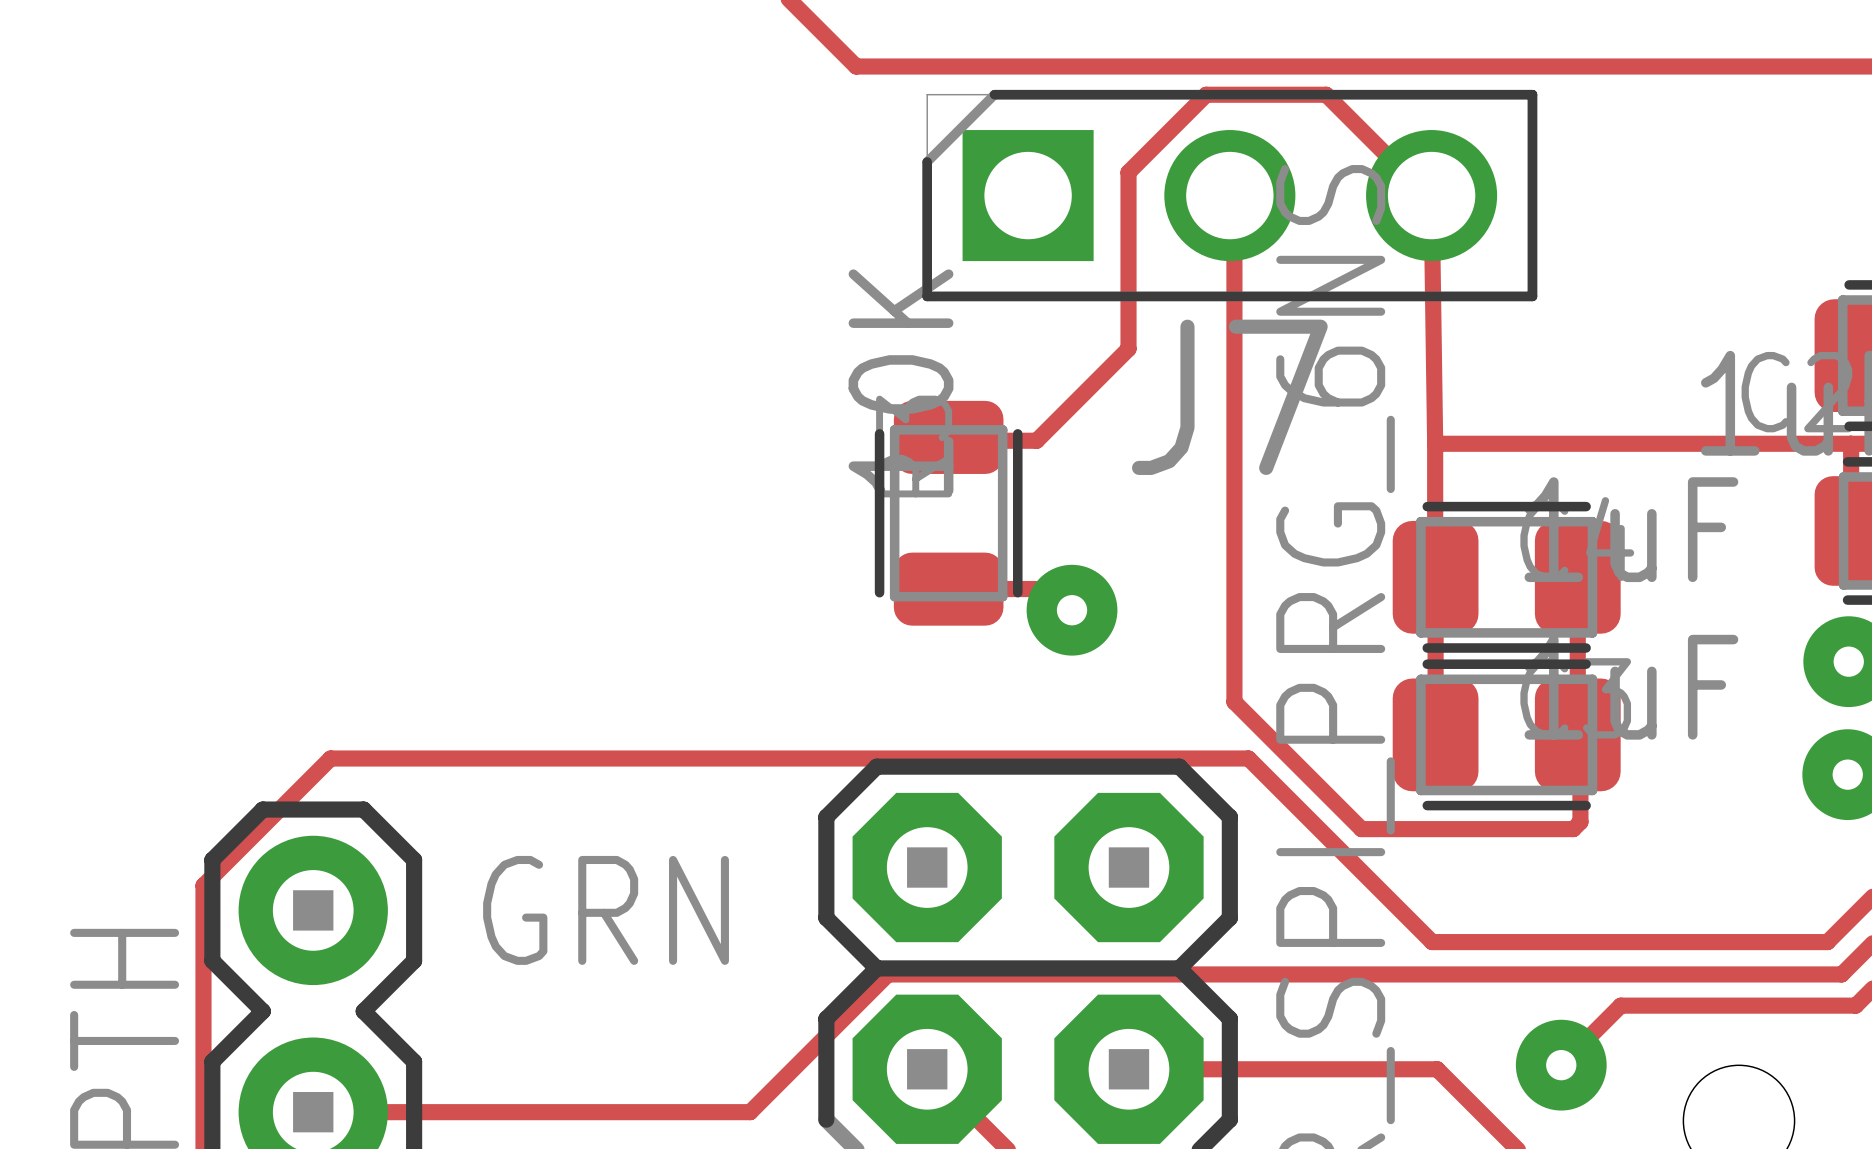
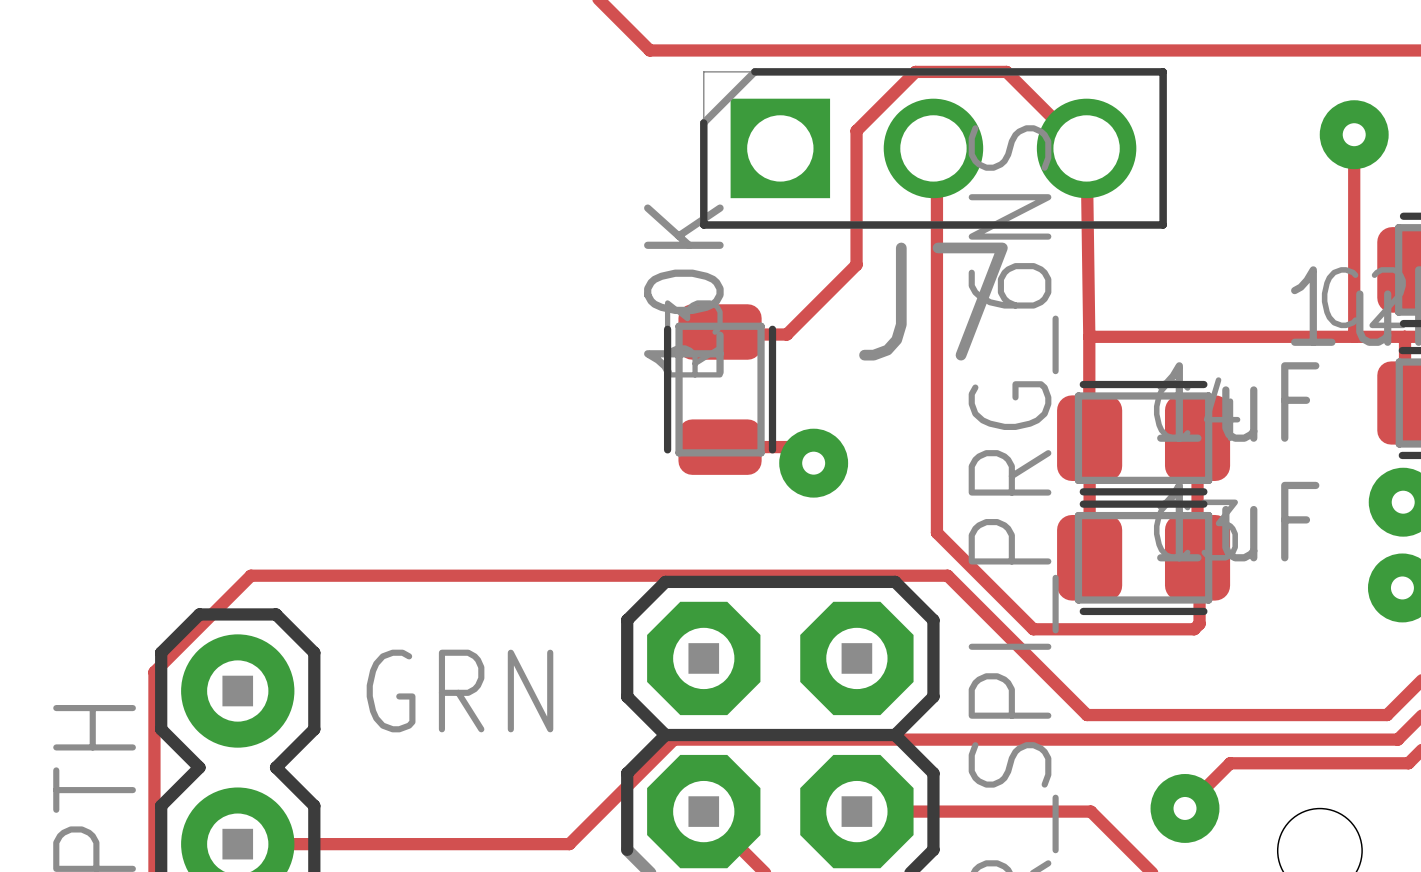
track: none -> (1354, 134) (1354, 336)
via: none -> (1354, 134)

